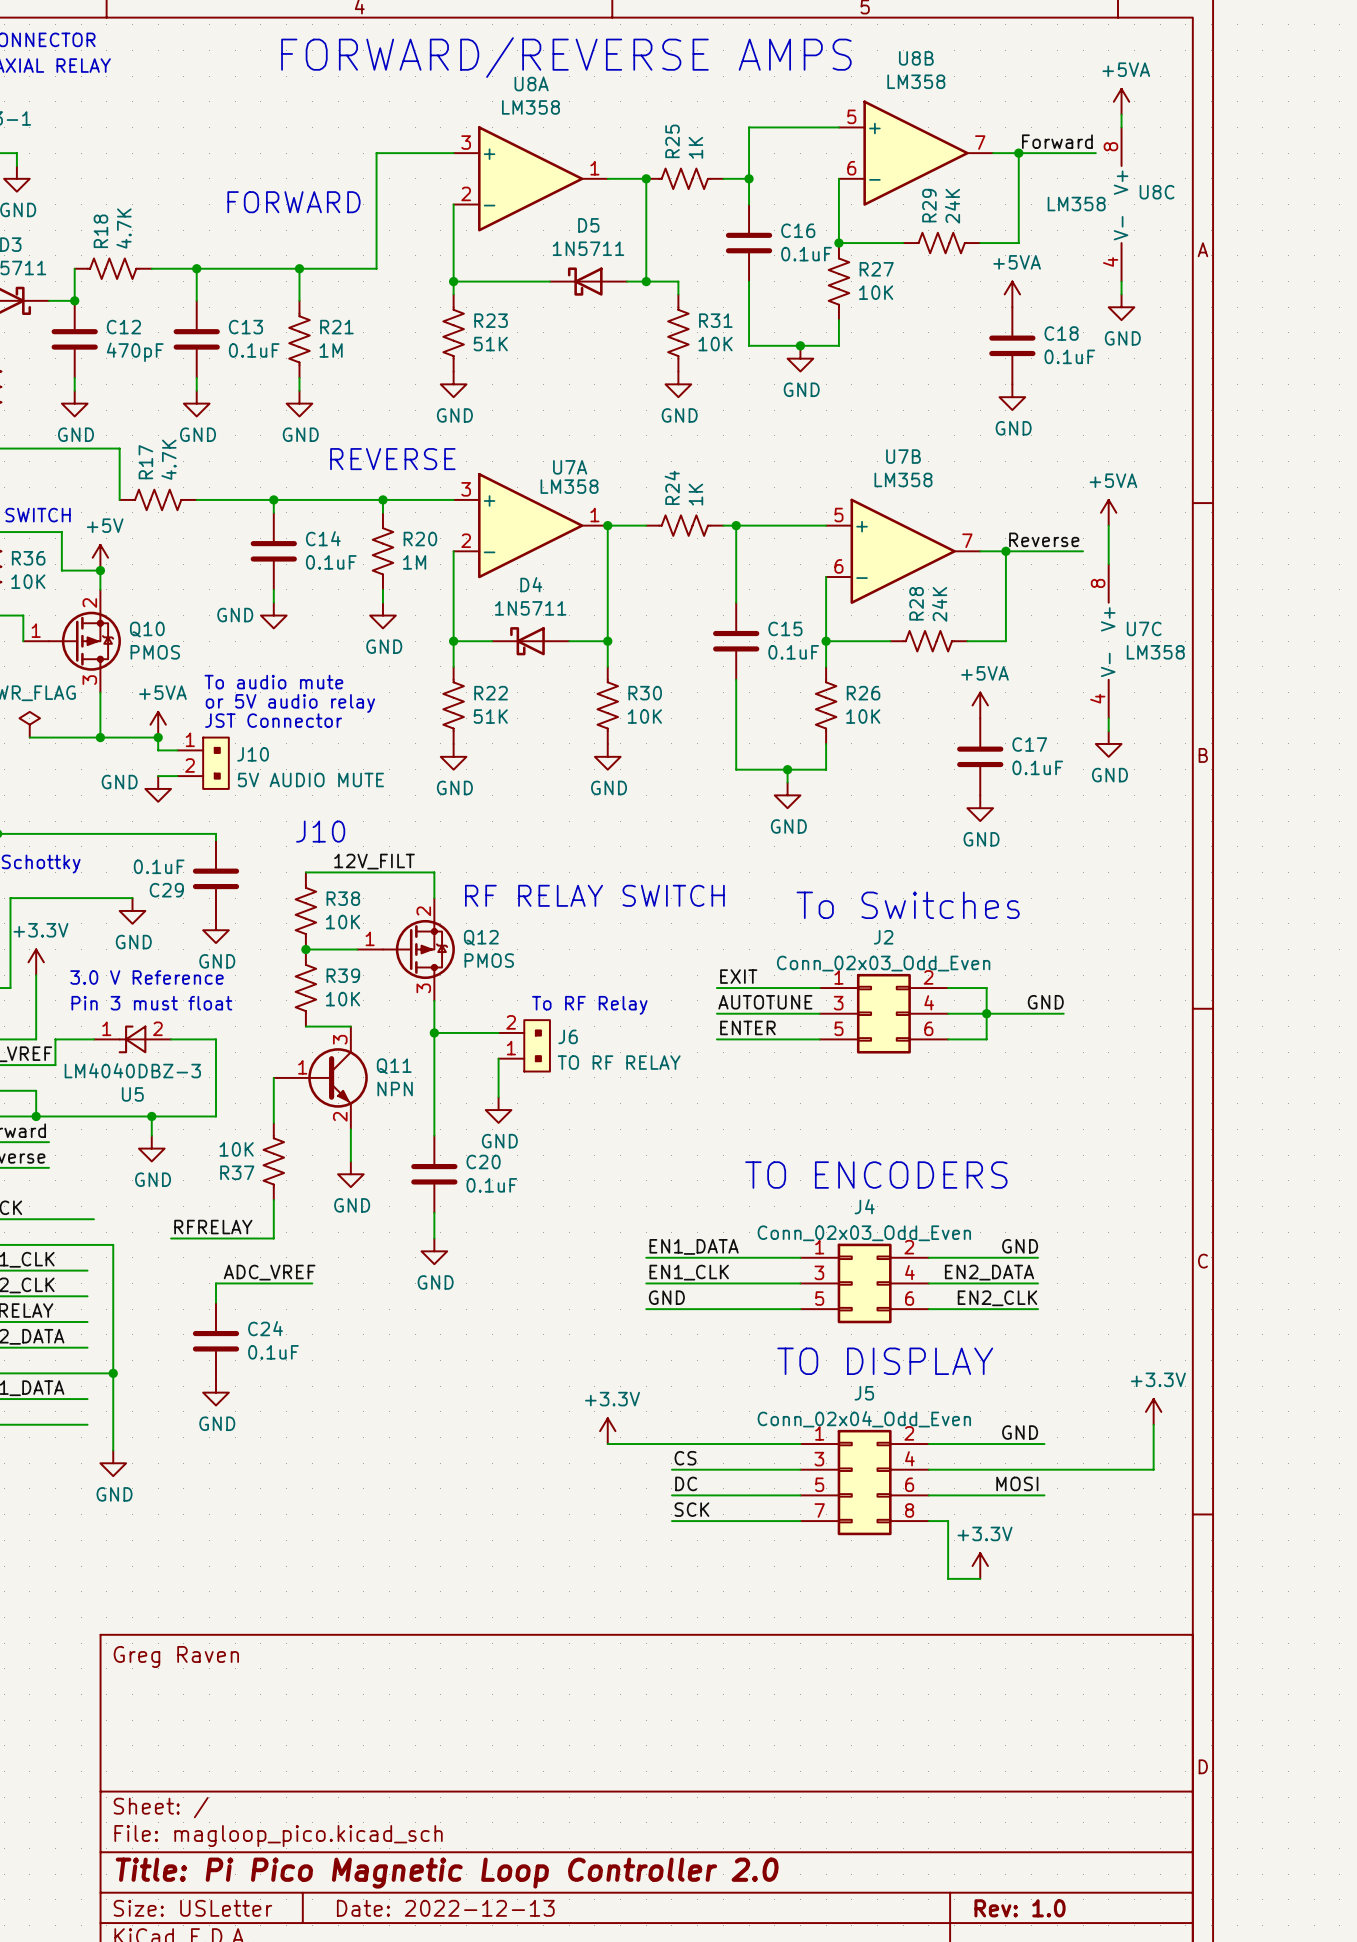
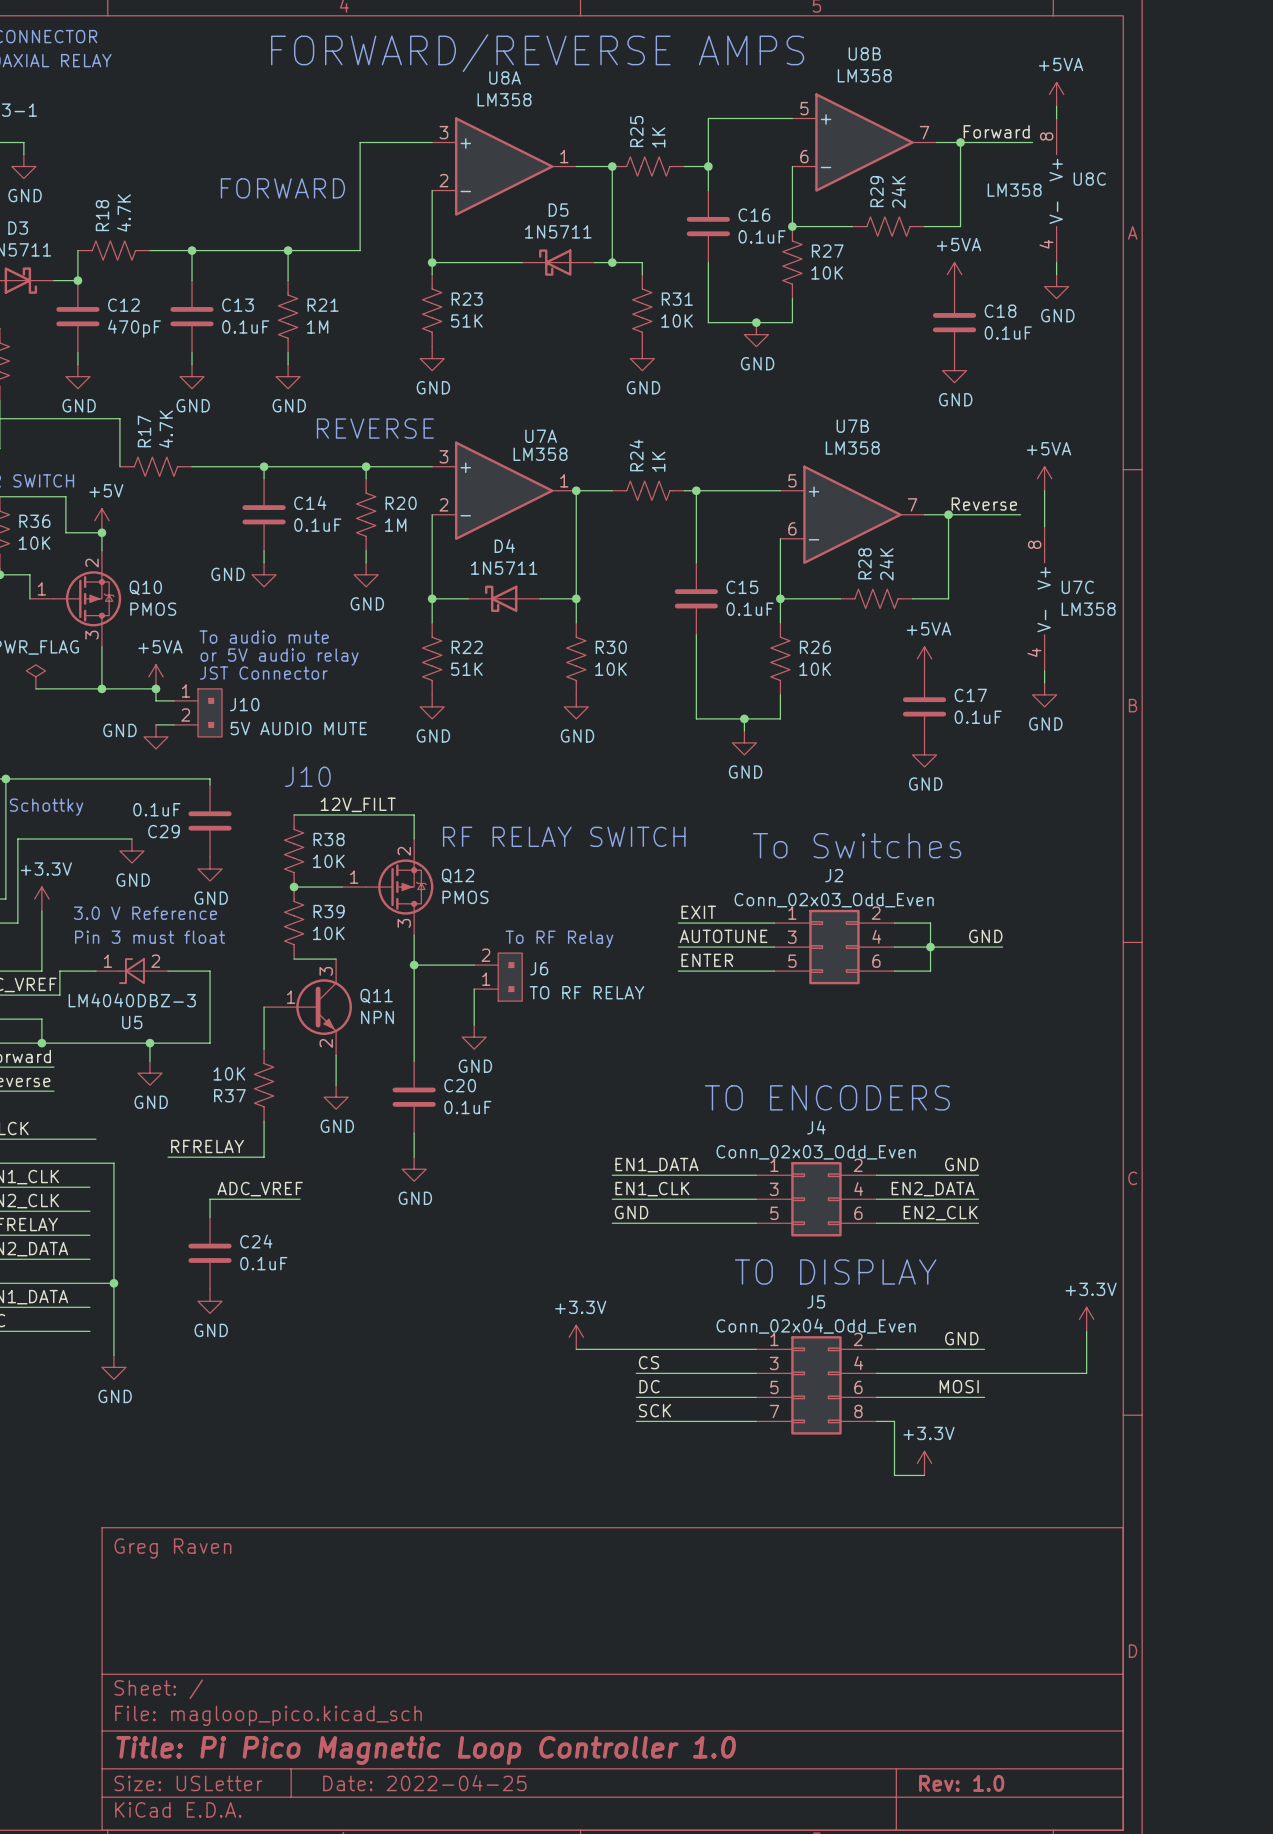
title block: Title: Pi Pico Magnetic Loop Controller 2.0 (447, 1873) -> Title: Pi Pico Magnetic Loop Controller 1.0 (426, 1750)
title block: Date: 2022-12-13 (445, 1908) -> Date: 2022-04-25 (424, 1783)

